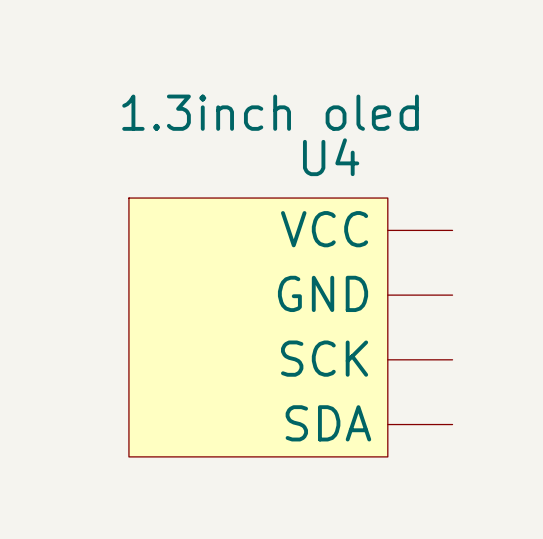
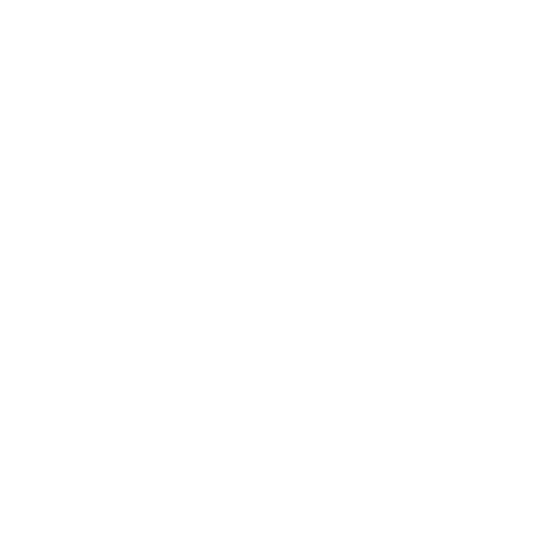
U4: 1.3inch oled (290, 327) -> none

